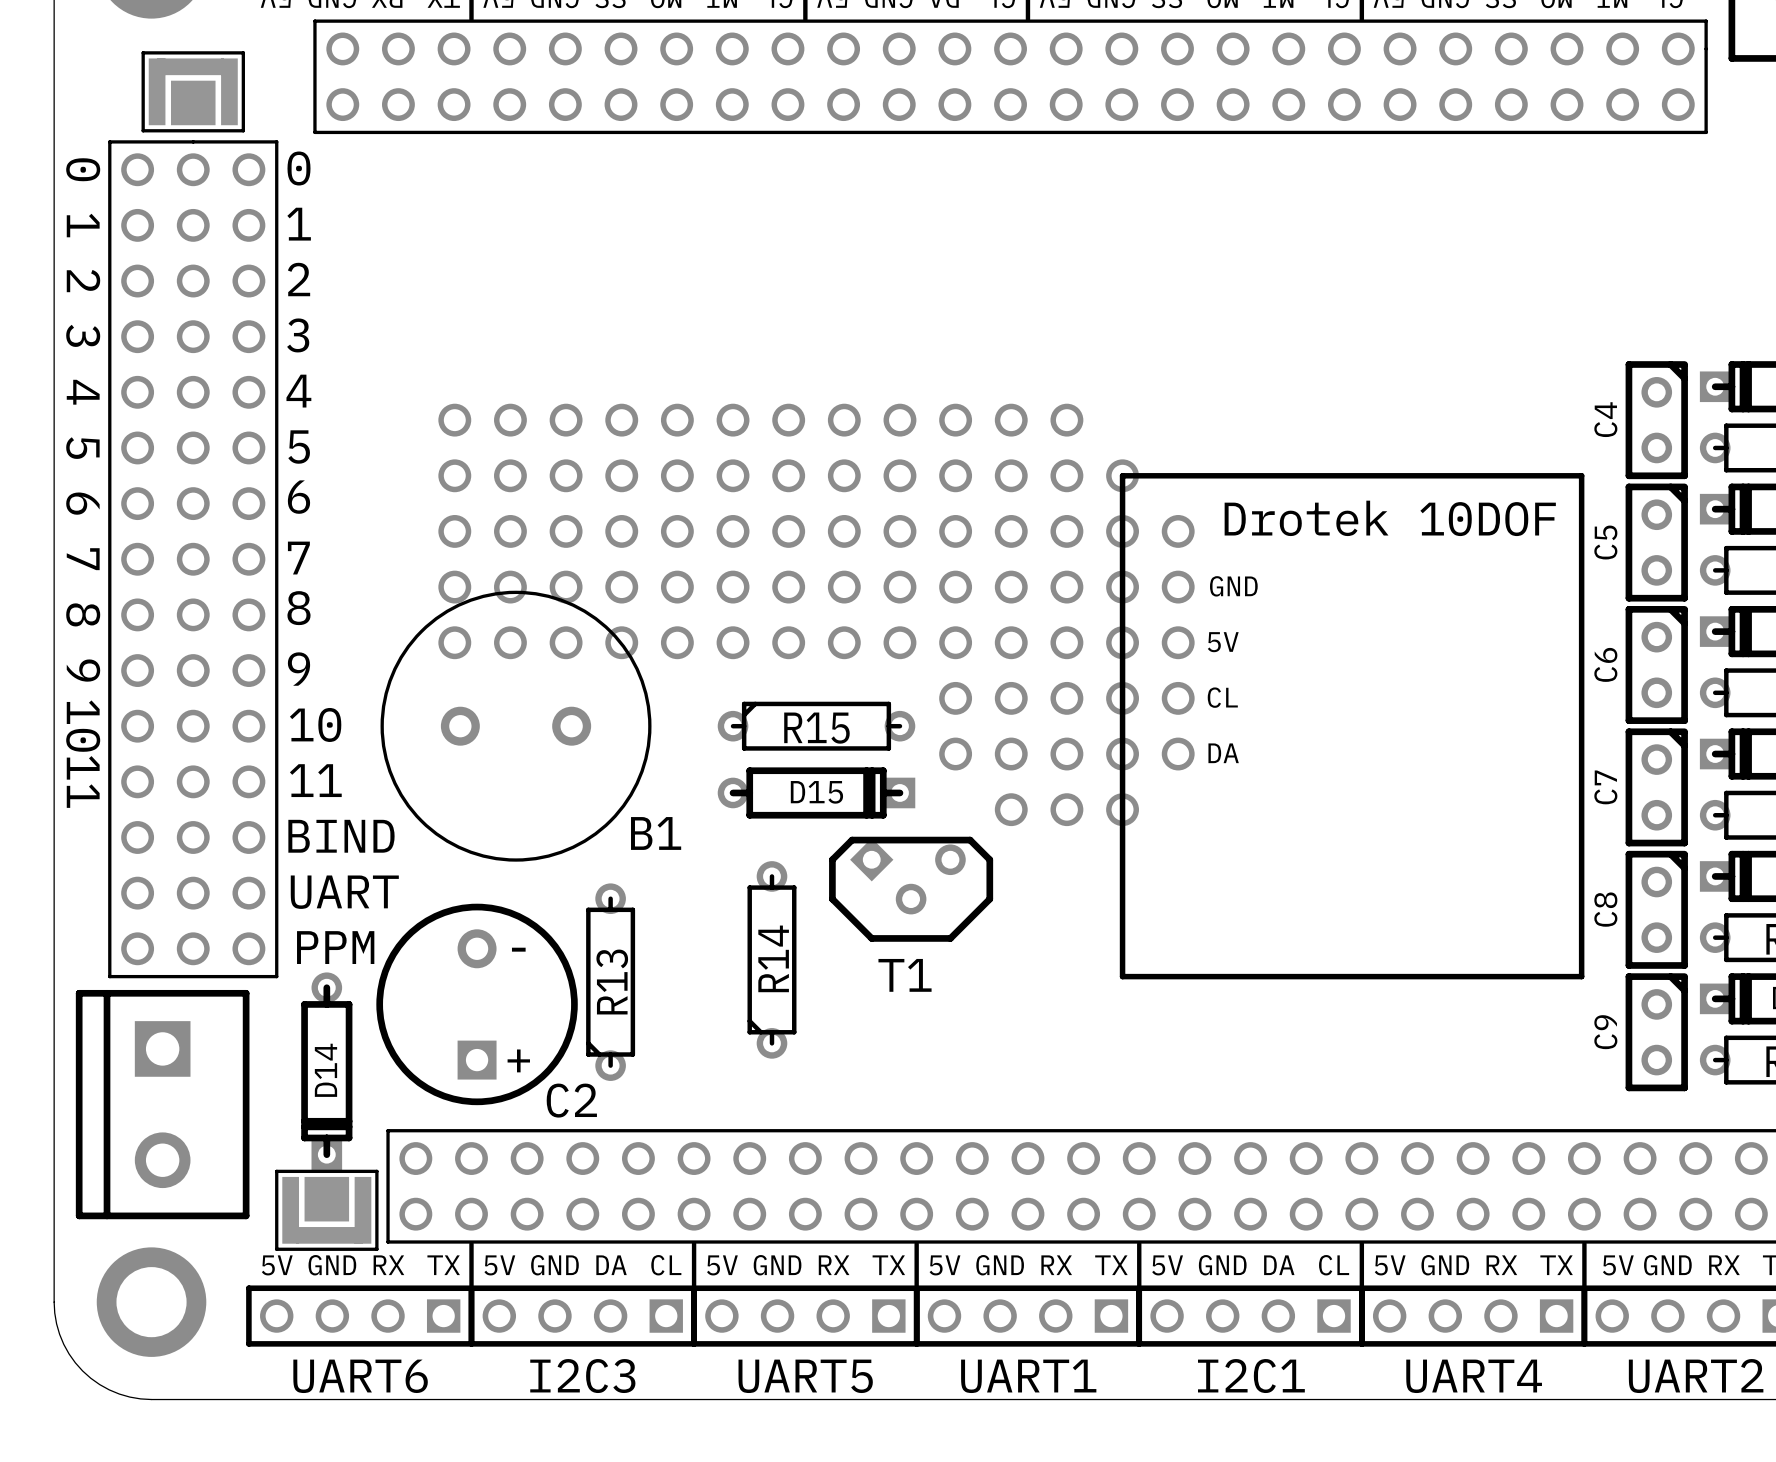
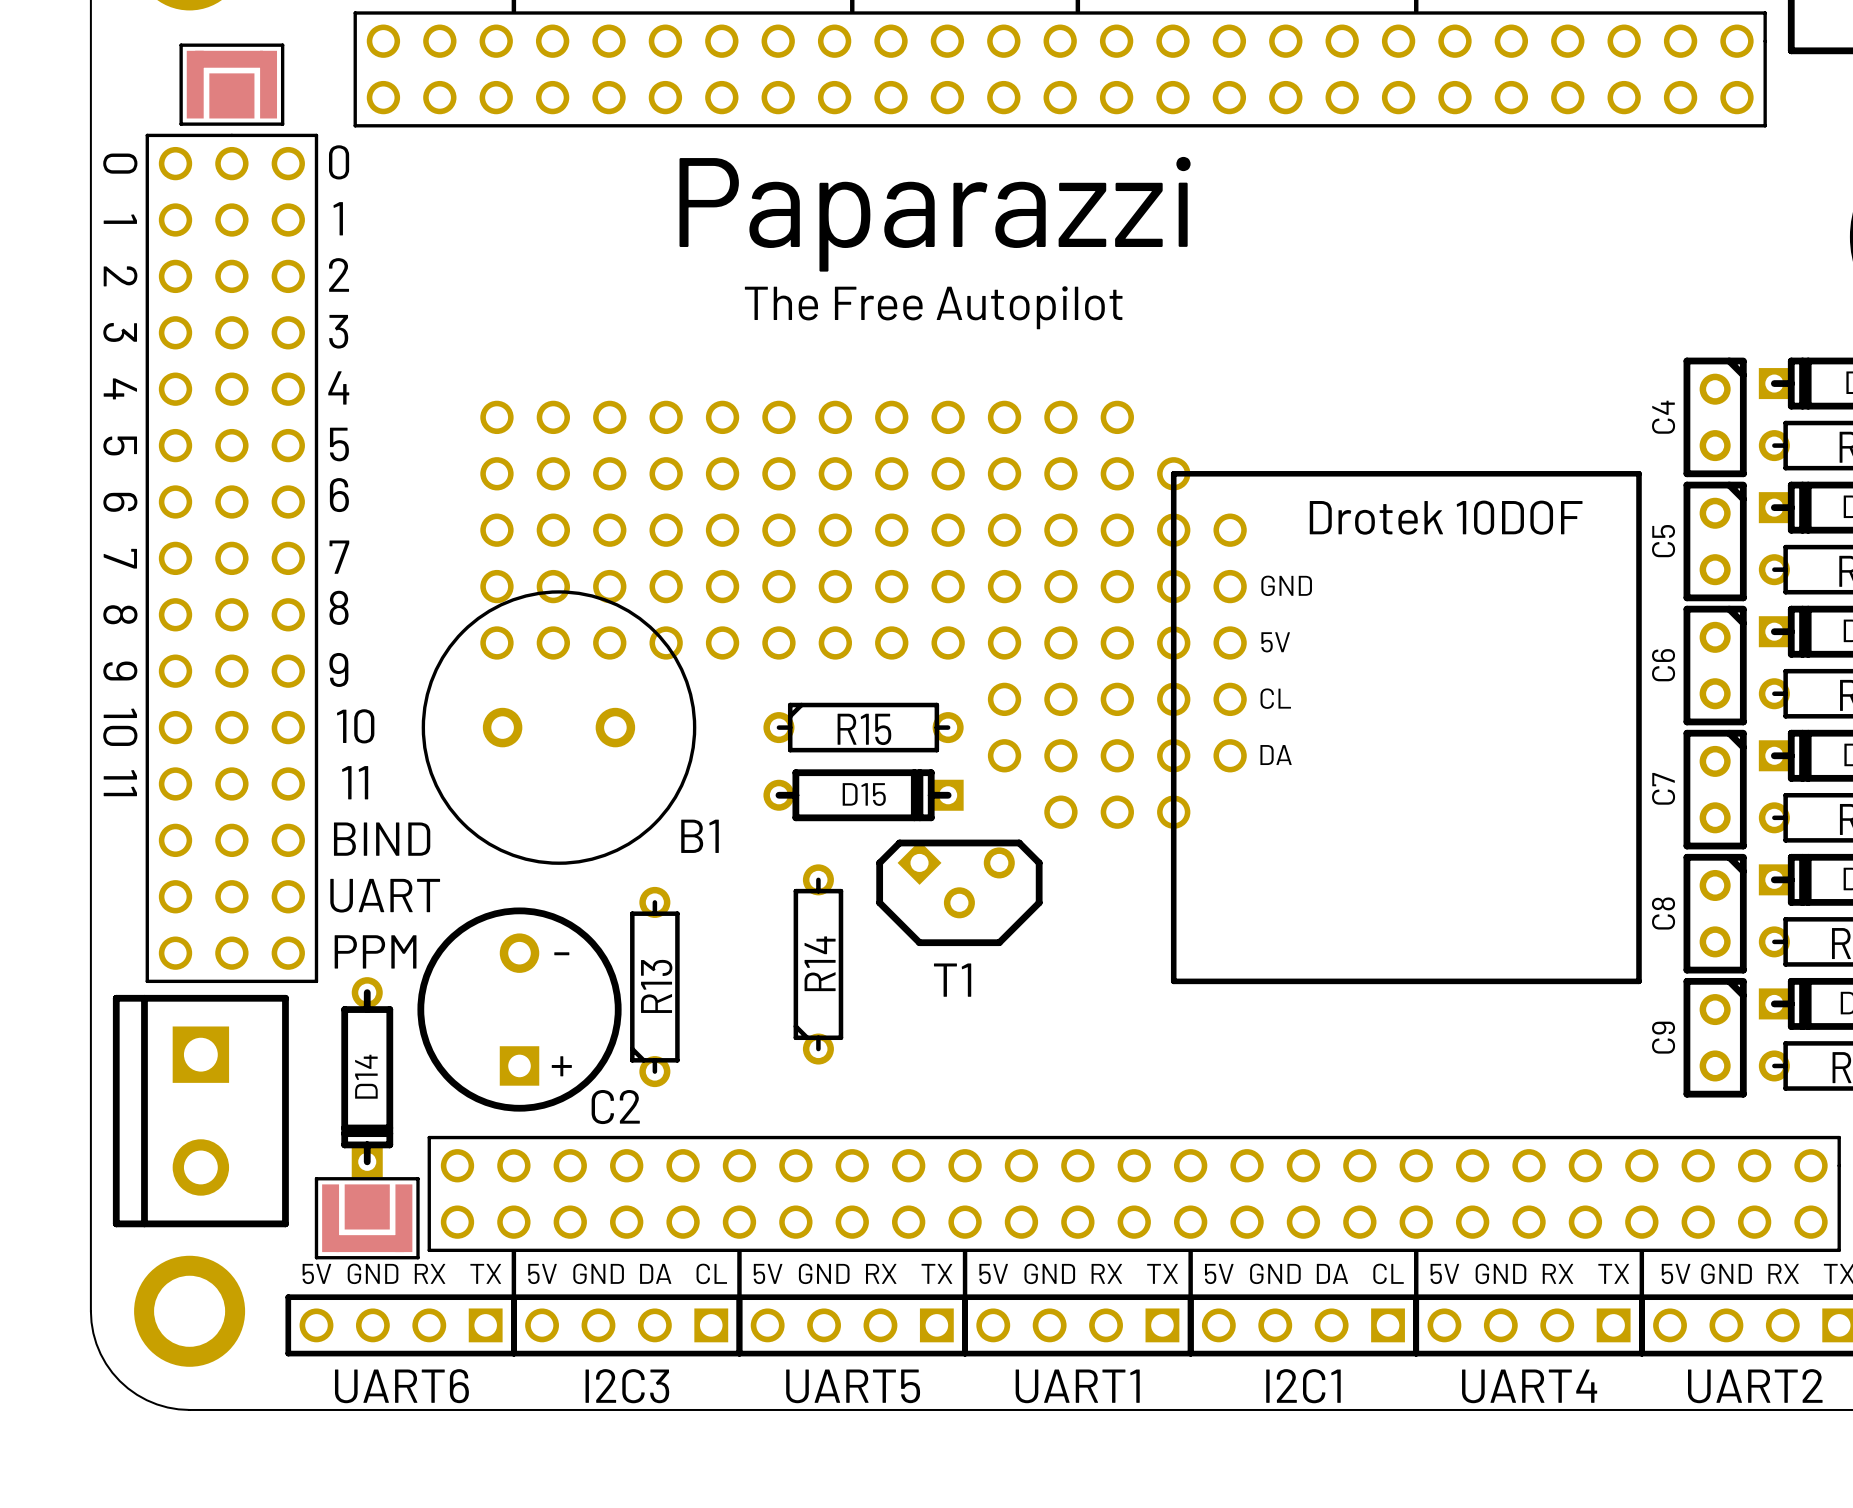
text: none -> Paparazzi (935, 214)
text: none -> The Free Autopilot (933, 307)

